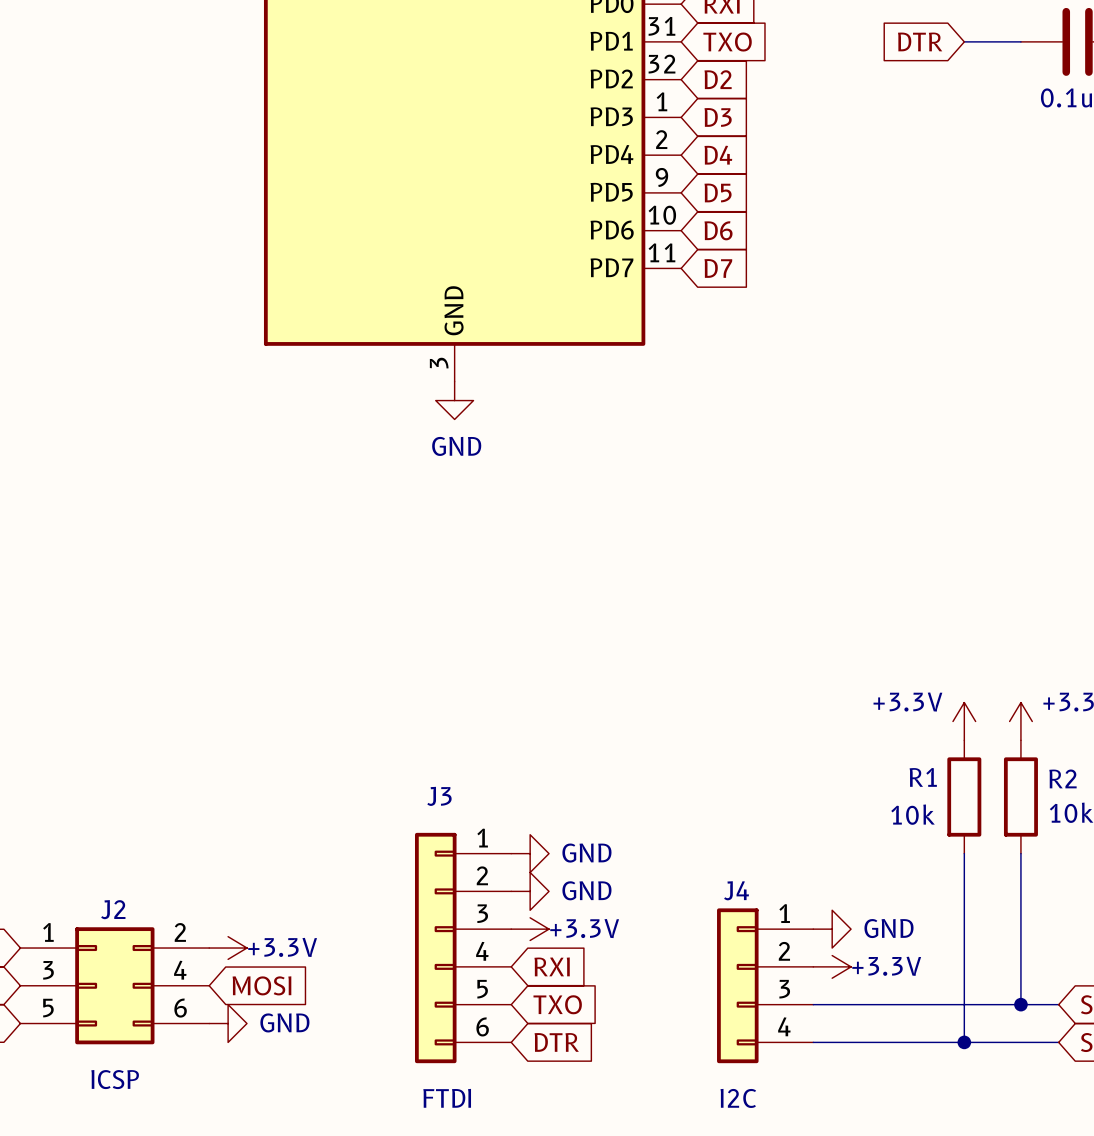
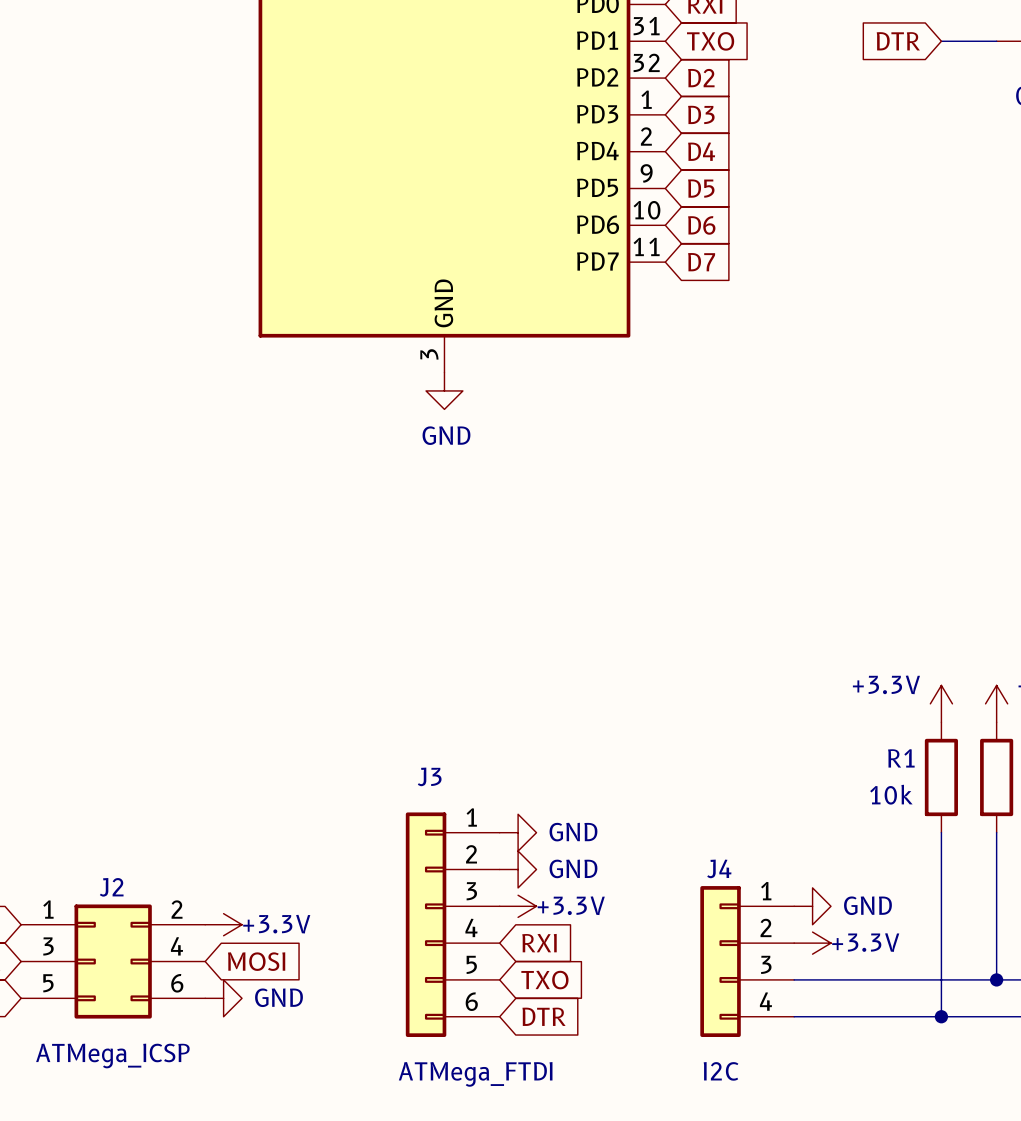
J2 value: ICSP (115, 1079) -> ATMega_ICSP (112, 1055)
J3 value: FTDI (447, 1098) -> ATMega_FTDI (475, 1074)

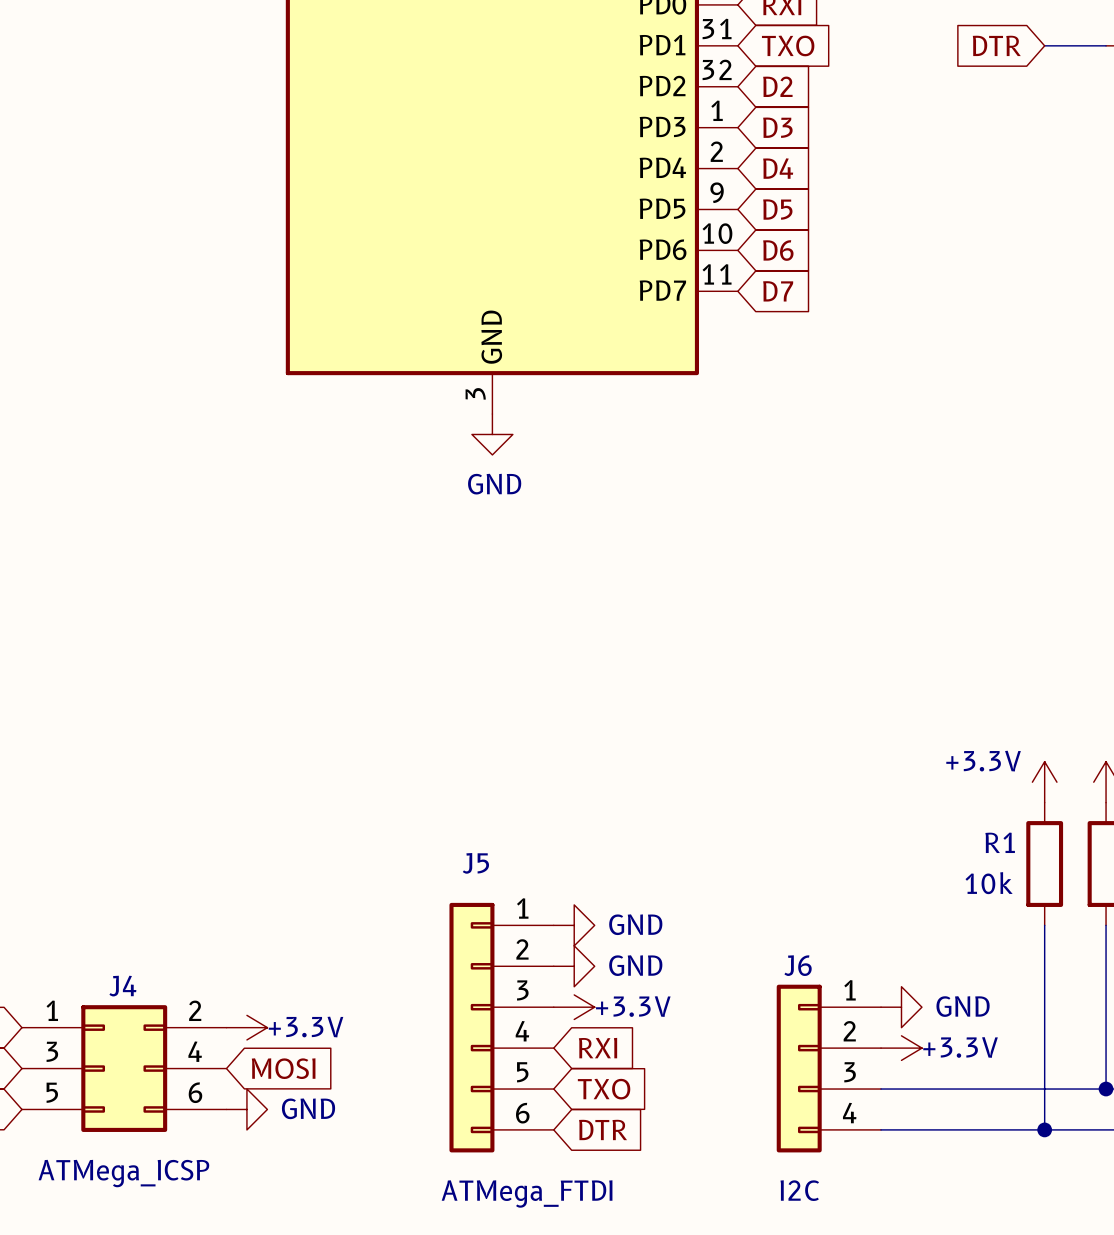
J3 name: J3 (429, 776) -> J5 (475, 863)
J4 name: J4 (719, 868) -> J6 (798, 965)
J2 name: J2 (111, 887) -> J4 (122, 986)

